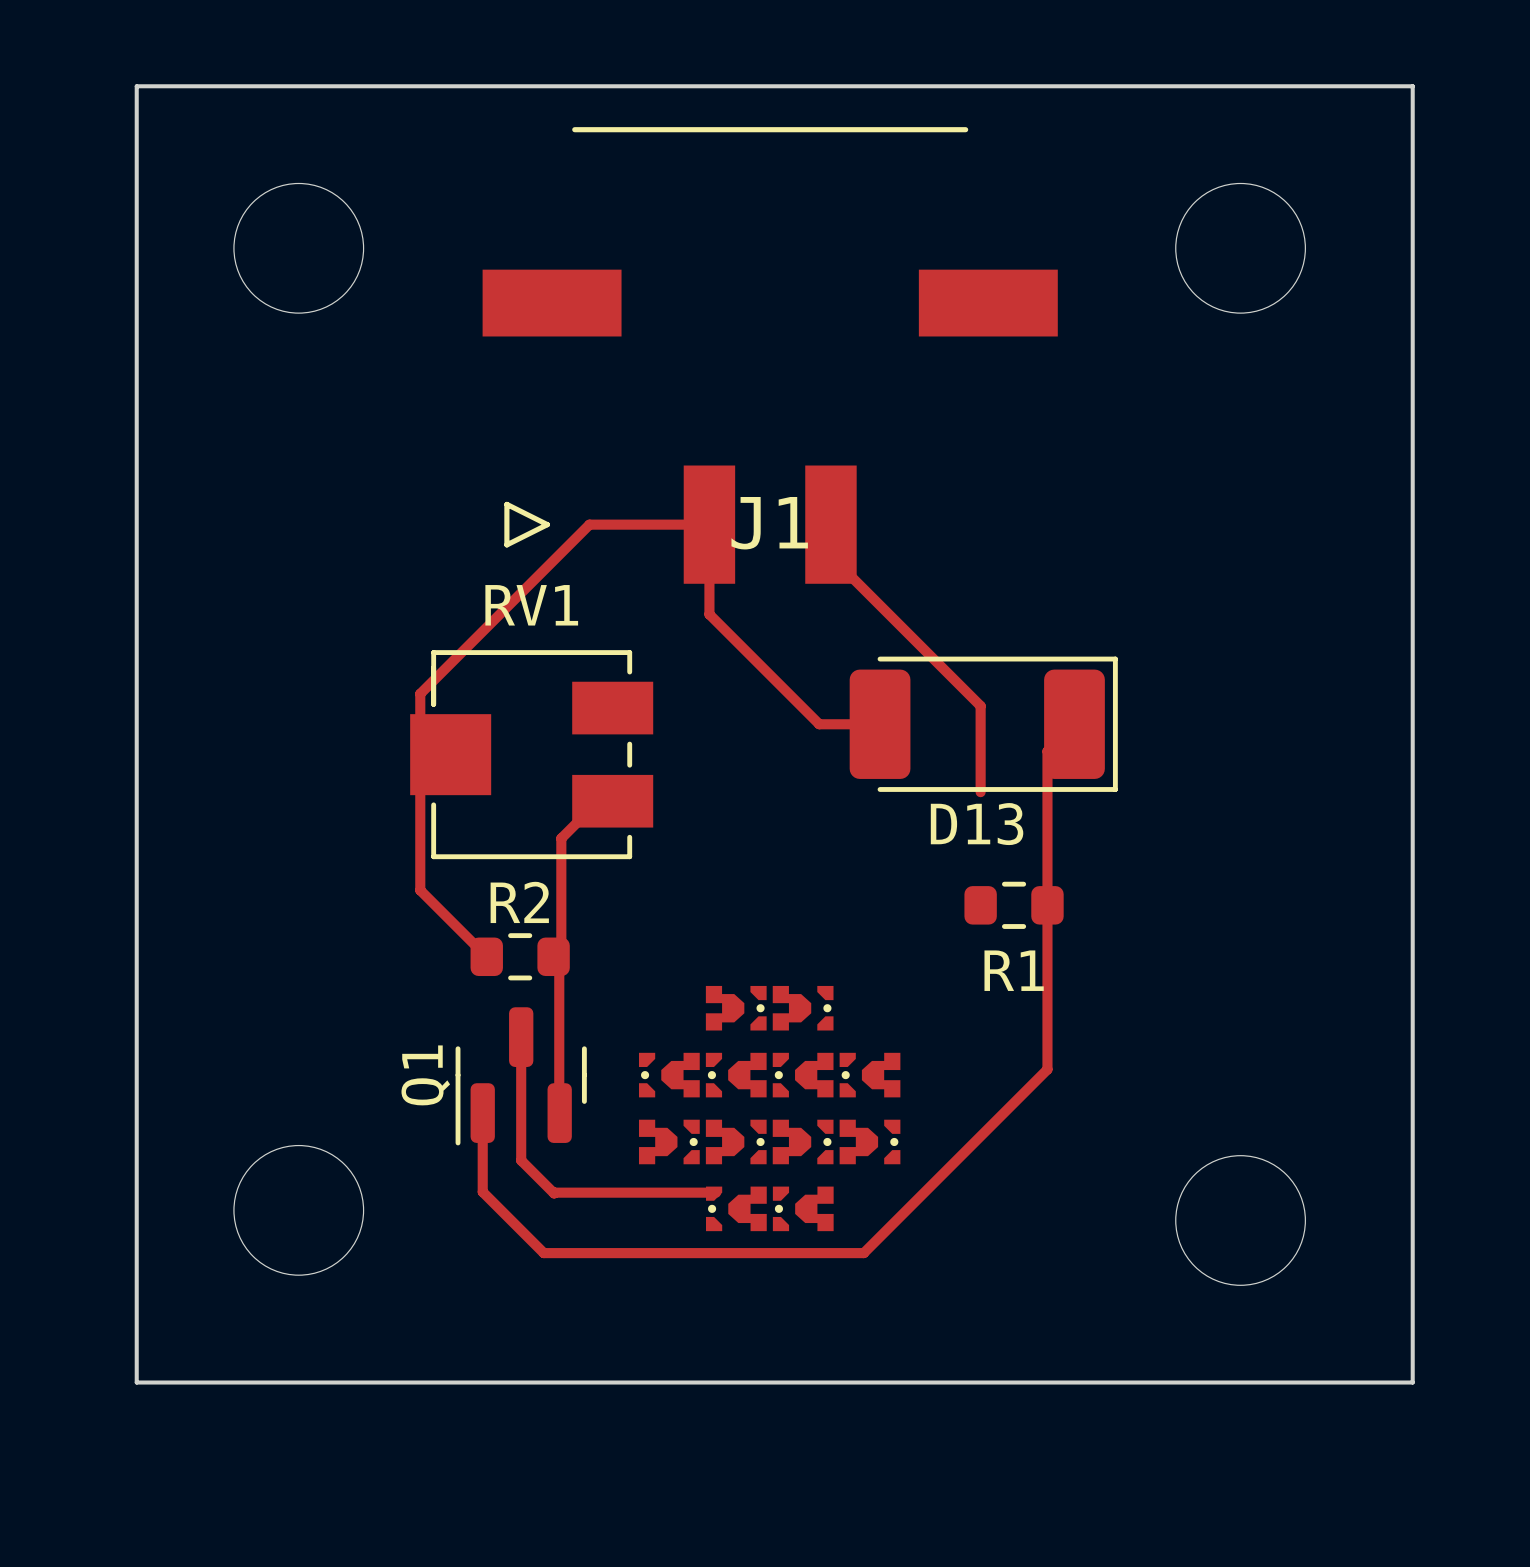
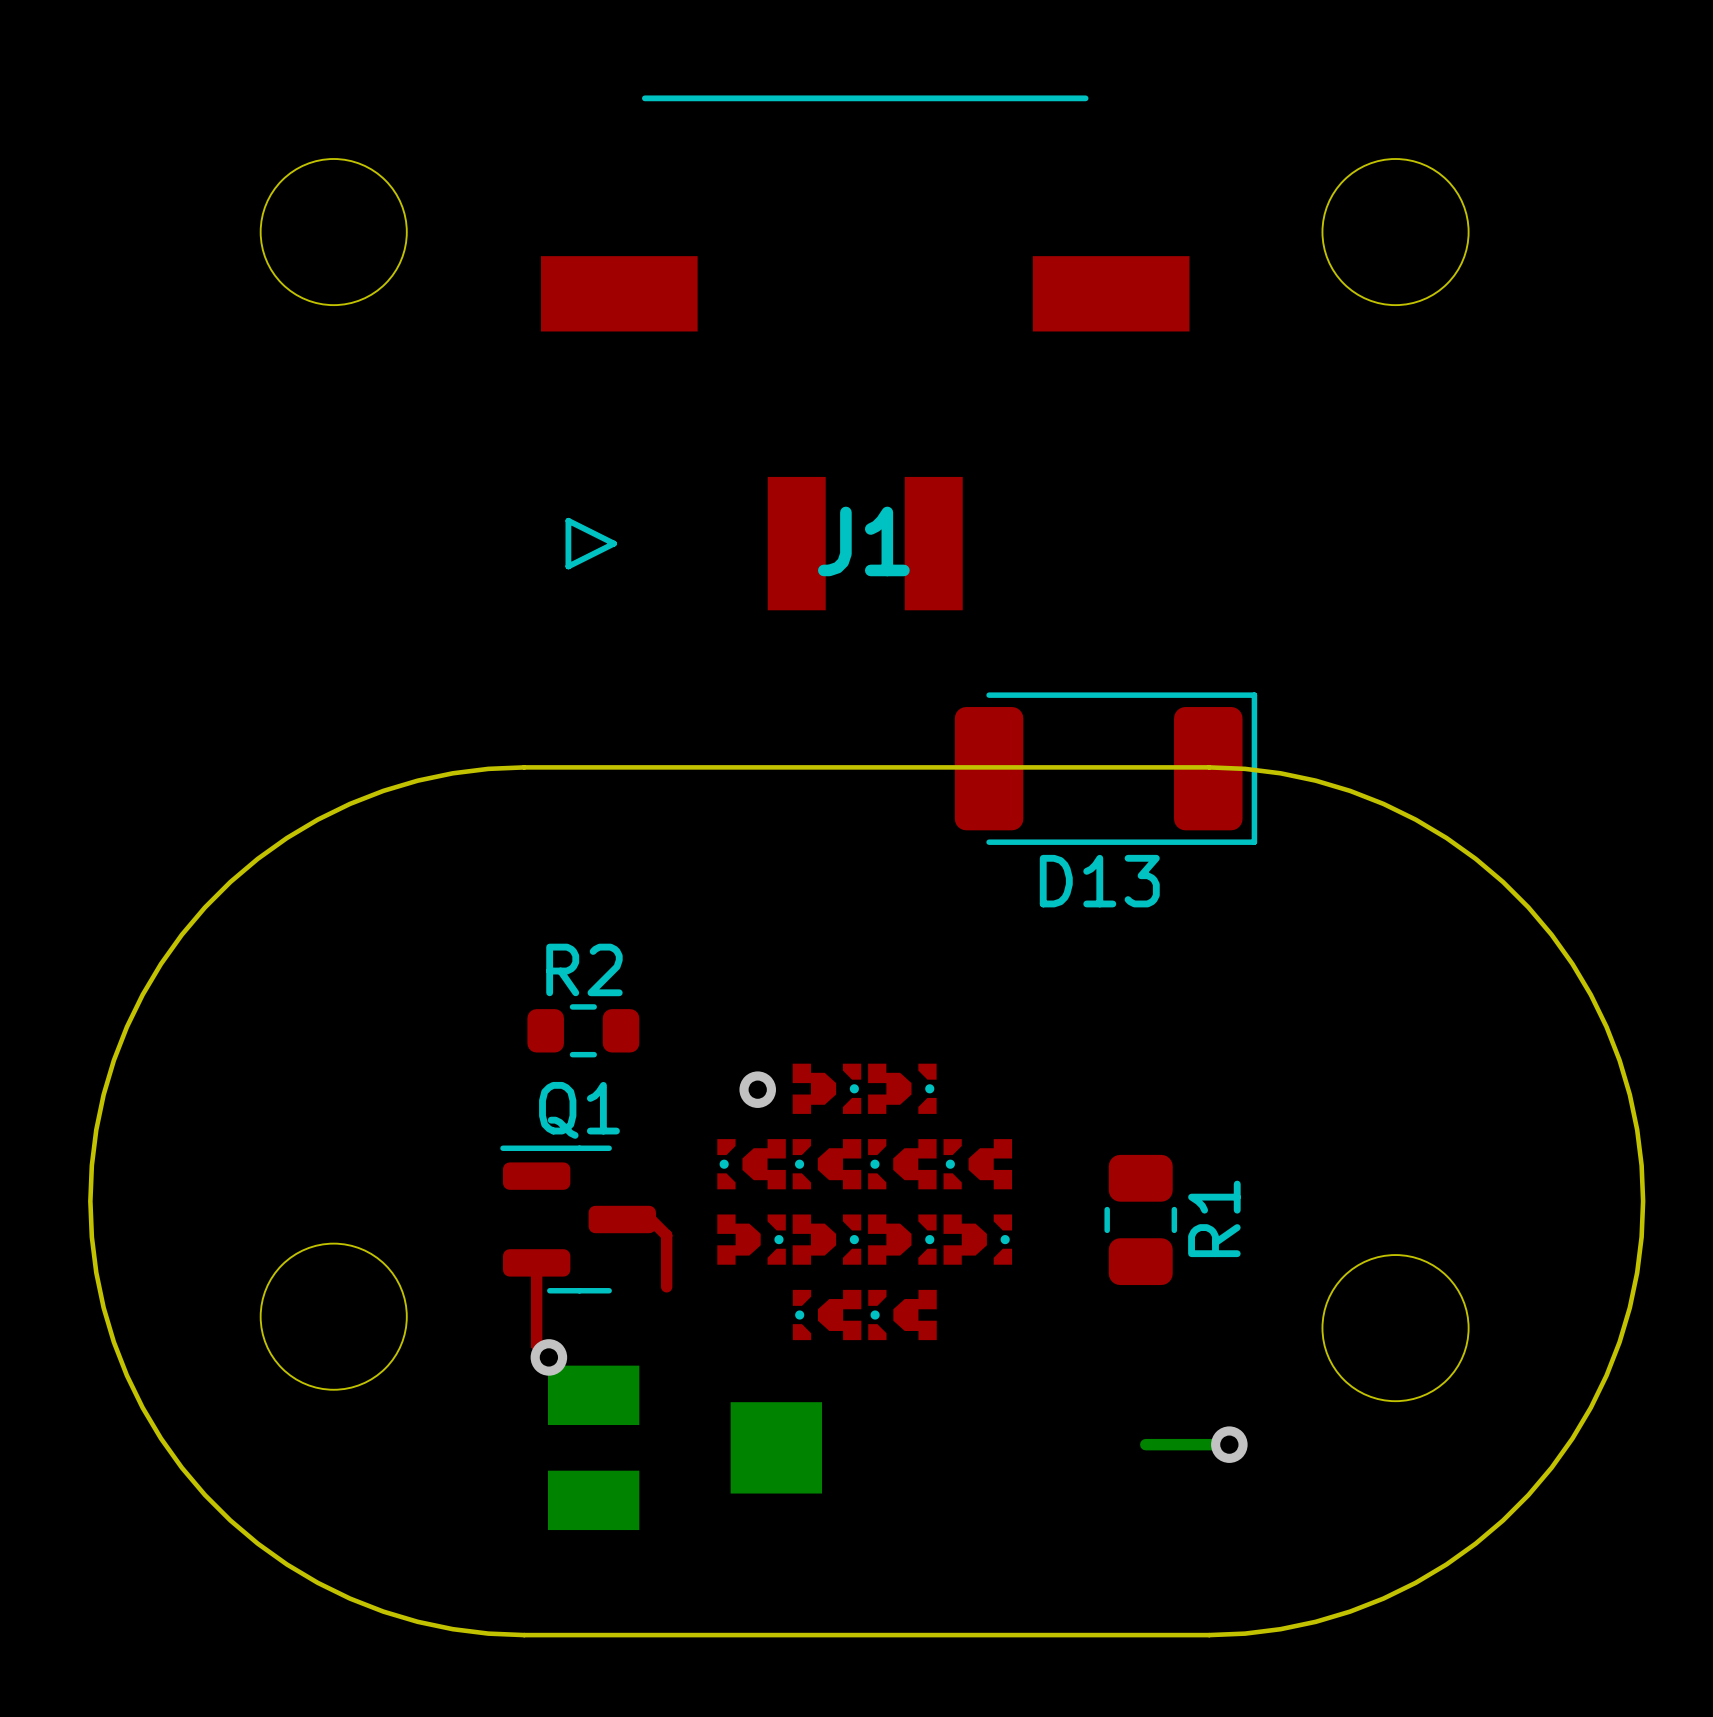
board edge: (136, 86) (1412, 86) (1412, 1382) (136, 1382) (136, 86) -> none
top track: (830, 556) (980, 706) (980, 792) -> none
board edge: none -> (524, 767) (1245, 768) (1315, 780) (1350, 790) (1415, 819) (1446, 838) (1503, 882) (1528, 907) (1572, 963) (1606, 1026) (1629, 1094) (1641, 1165) (1641, 1237) (1637, 1272) (1619, 1342) (1590, 1407) (1572, 1438) (1528, 1495) (1503, 1520) (1446, 1564) (1415, 1582) (1350, 1611) (1315, 1621) (1245, 1633) (488, 1633) (417, 1621) (383, 1611) (317, 1582) (286, 1564) (230, 1520) (181, 1467) (142, 1407) (113, 1342) (96, 1272) (90, 1201) (96, 1129) (113, 1060) (142, 994) (181, 934) (230, 882) (286, 838) (317, 819) (383, 790) (452, 773) (524, 767)
top track: (880, 724) (819, 724) (709, 614) (709, 524) (589, 524) (420, 693) (420, 890) (486, 956) -> none
top track: (1074, 724) (1047, 751) (1047, 1069) (863, 1253) (543, 1253) (482, 1191) (482, 1113) -> none
RV1 side: top (531, 754) -> bottom (684, 1447)
top track: (612, 801) (598, 801) (561, 838) (561, 949) (553, 956) (559, 962) (559, 1112) -> none
R1 footprint: [964, 881, 1064, 929] -> [1104, 1154, 1178, 1286]
R1 name position: R1 (1014, 970) -> R1 (1214, 1218)
via: none -> (757, 1089)
top track: (521, 1037) (521, 1160) (554, 1193) (716, 1192) -> none
Q1 rotation: 0° (521, 1076) -> 90° clockwise (578, 1219)
top track: none -> (622, 1219) (650, 1219) (666, 1235) (666, 1286)
top track: none -> (536, 1262) (536, 1345) (548, 1357)
via: none -> (548, 1357)
bottom track: none -> (1145, 1444) (1229, 1444)
via: none -> (1229, 1444)

